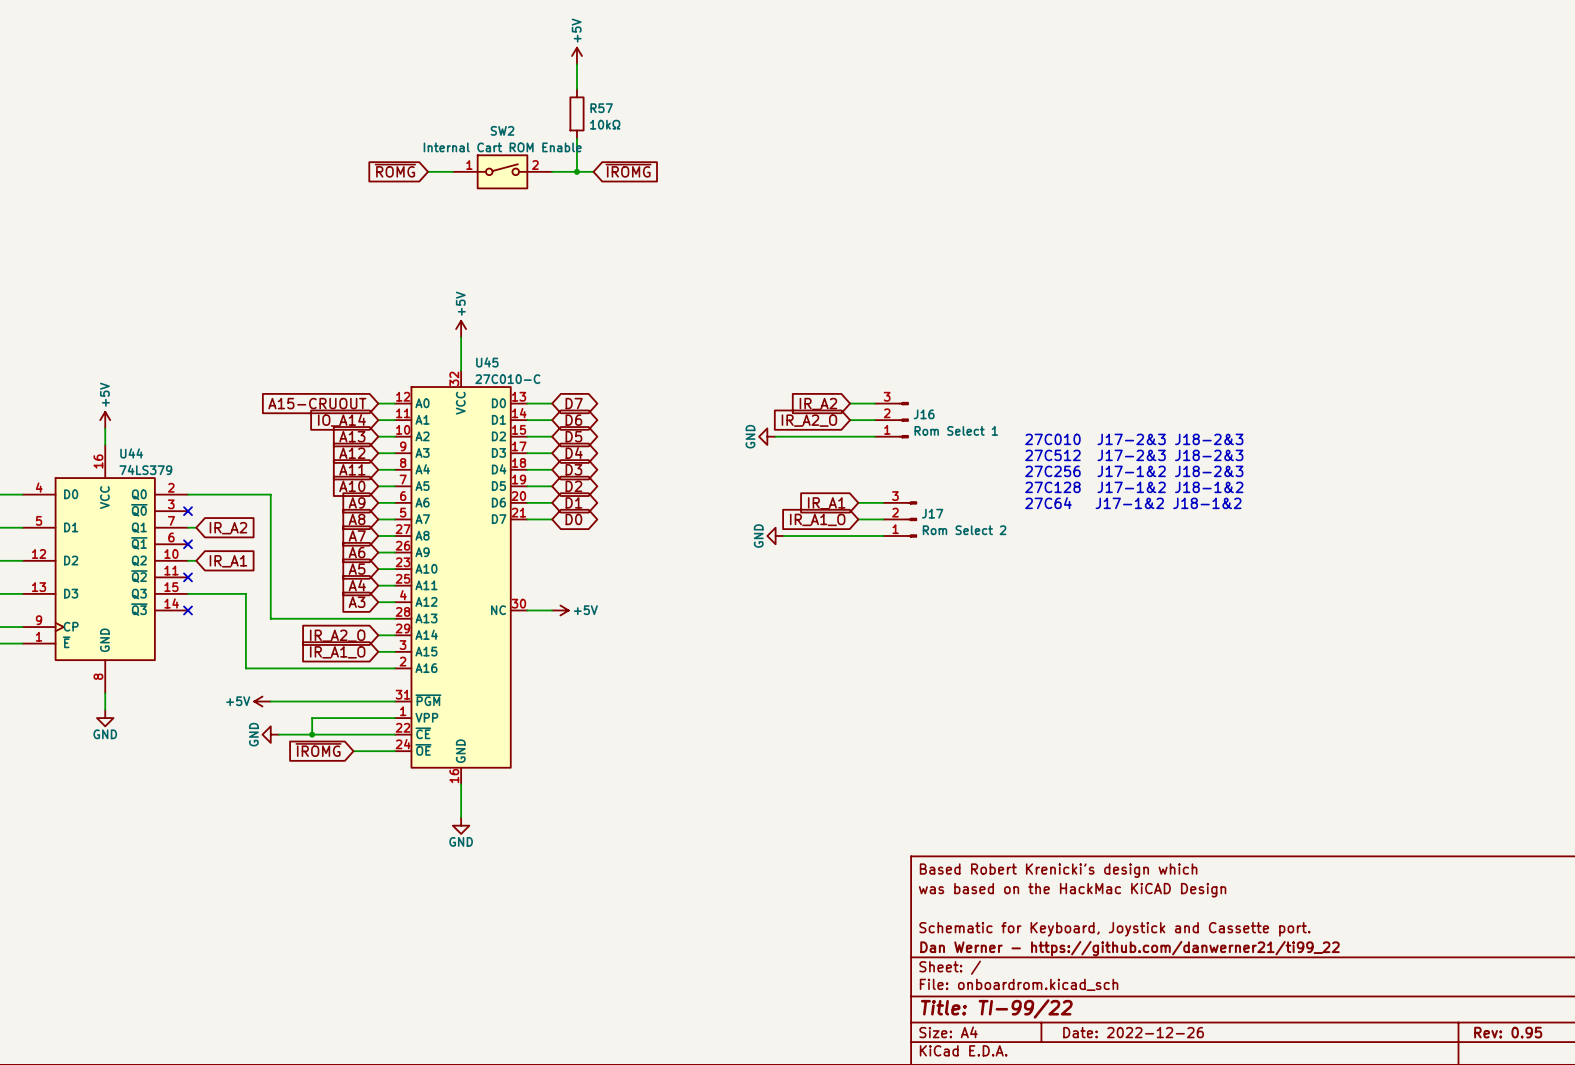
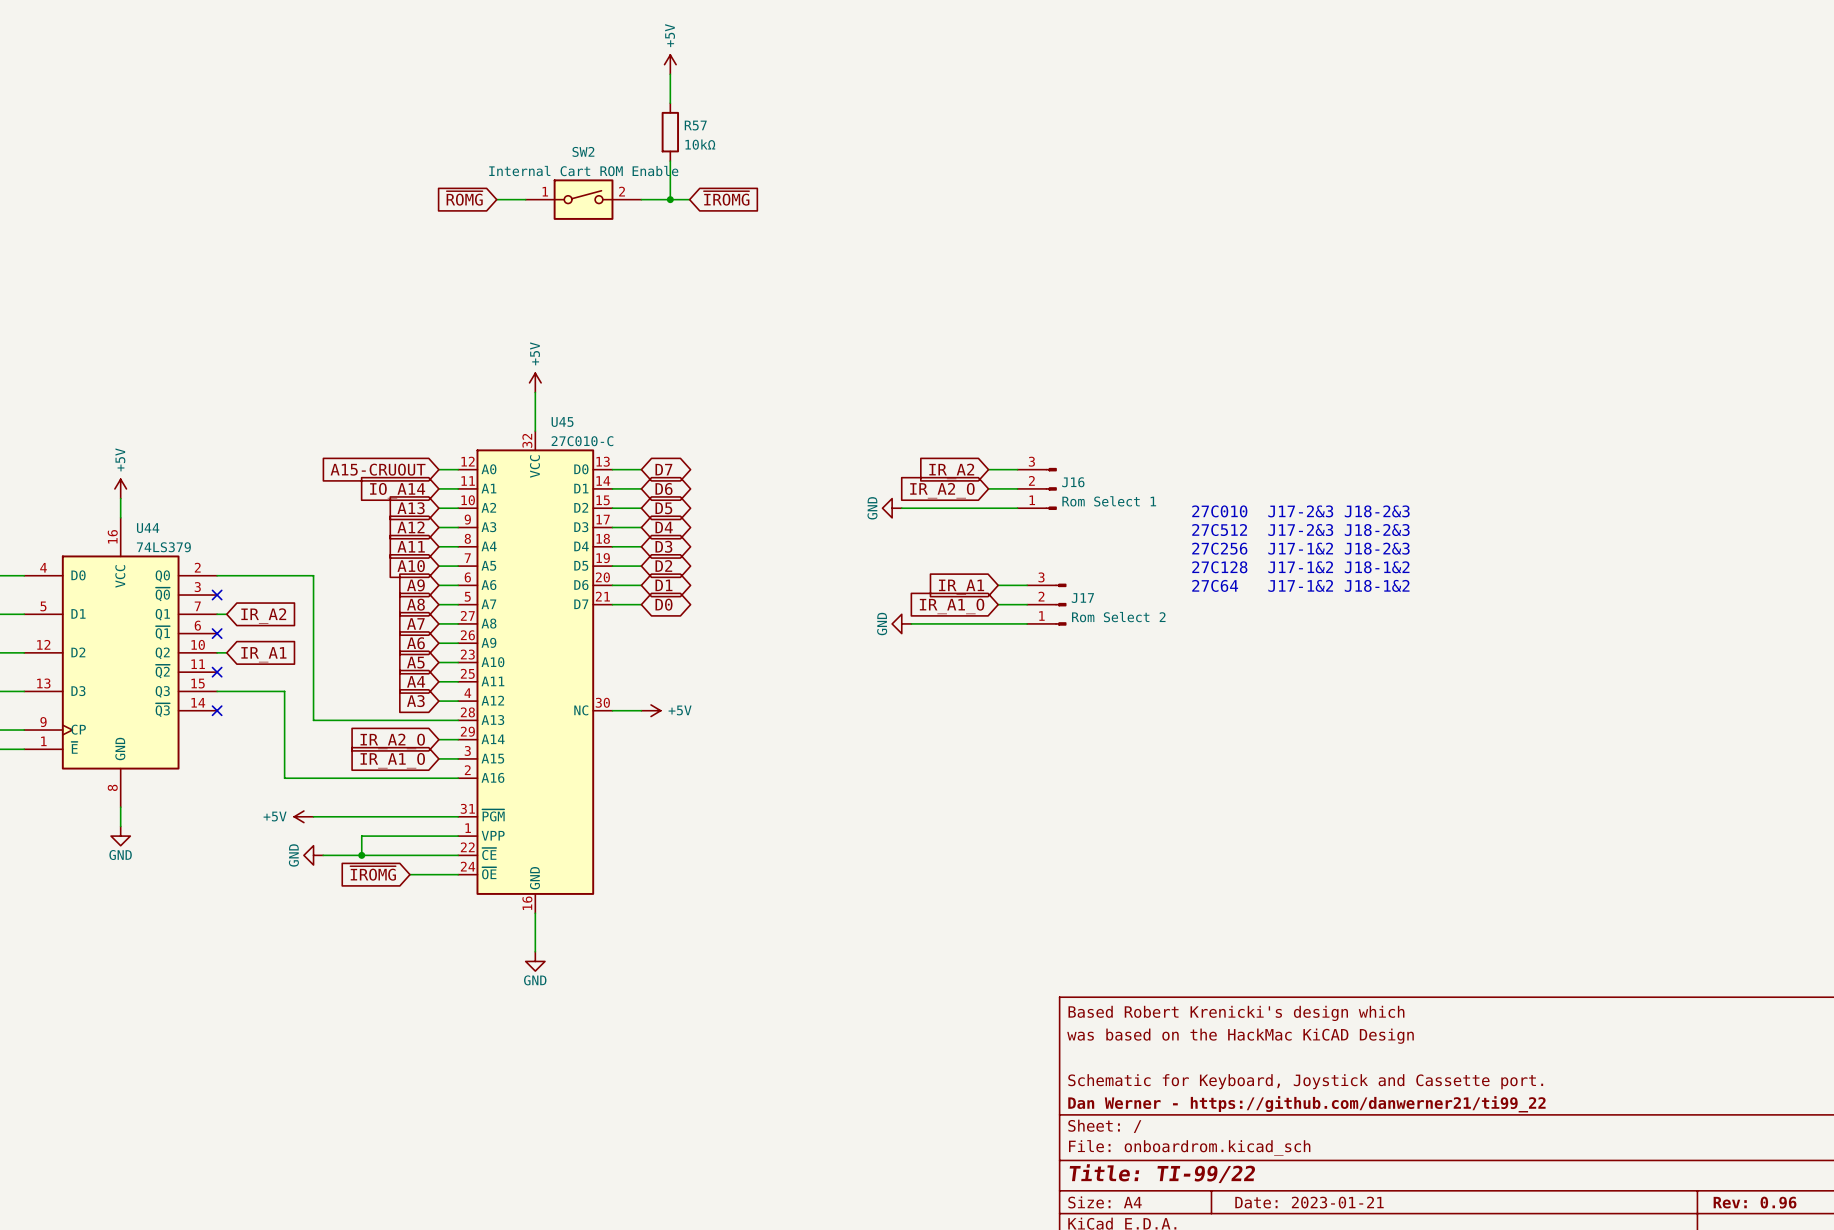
title block: Date: 2022-12-26 (1133, 1032) -> Date: 2023-01-21 (1309, 1202)
title block: Rev: 0.95 (1508, 1032) -> Rev: 0.96 (1755, 1202)

